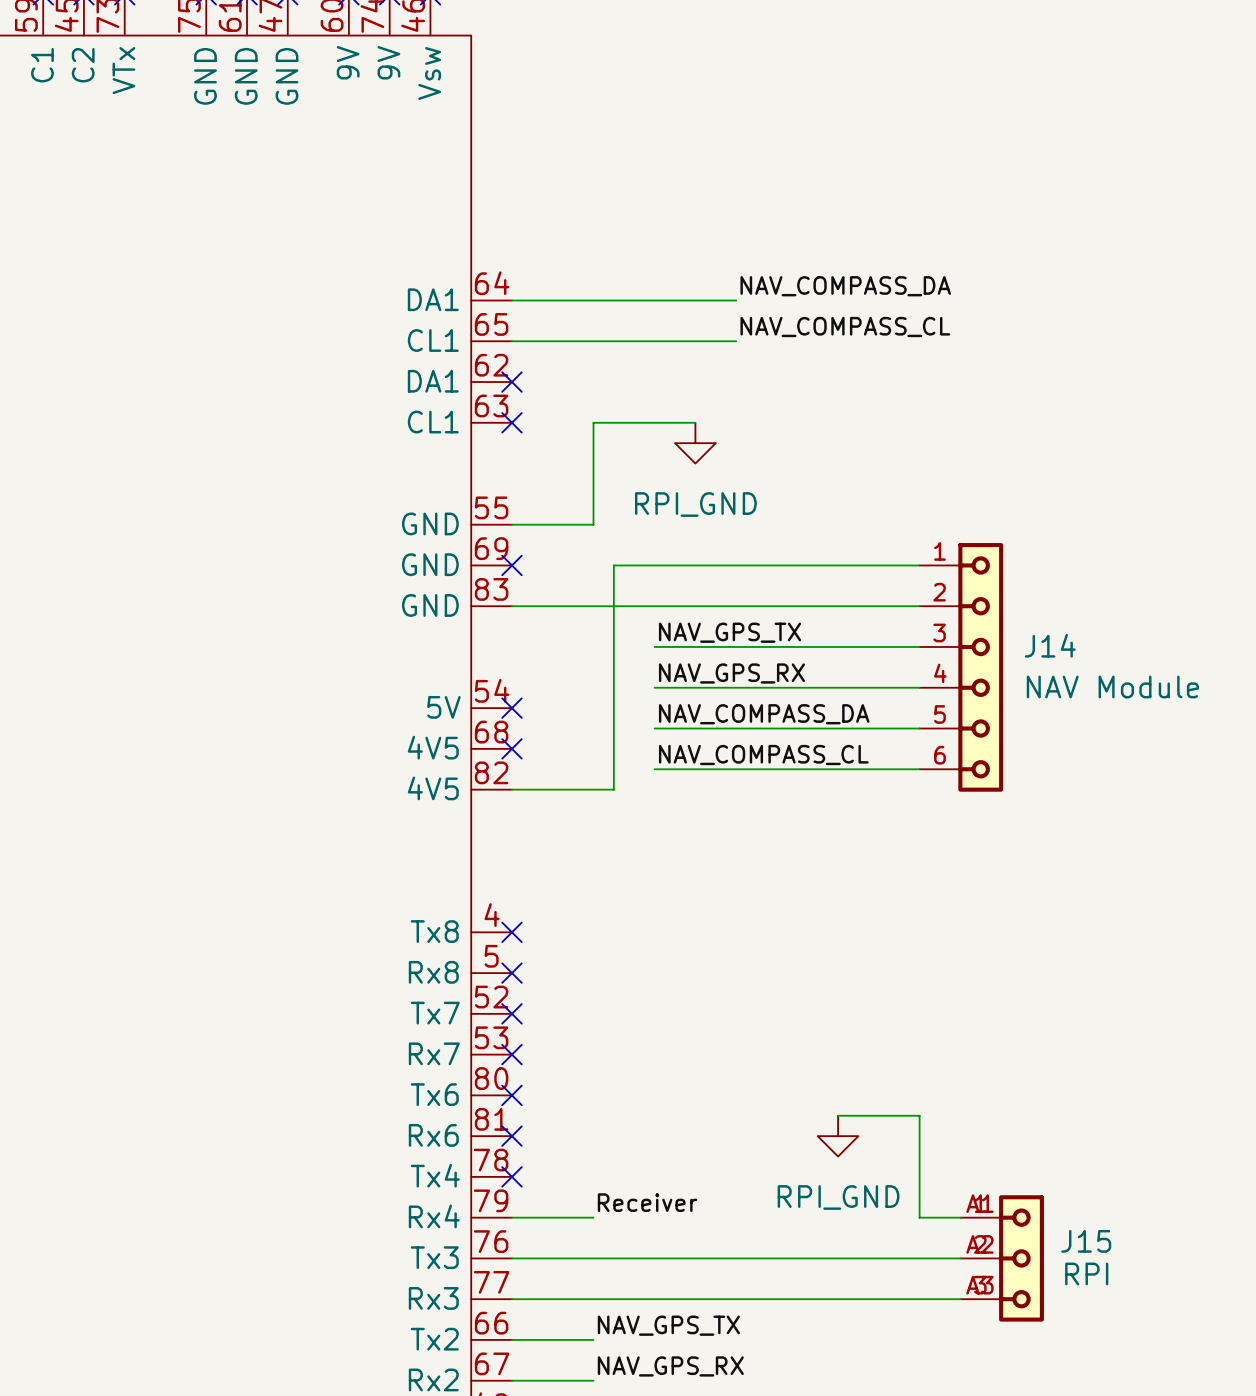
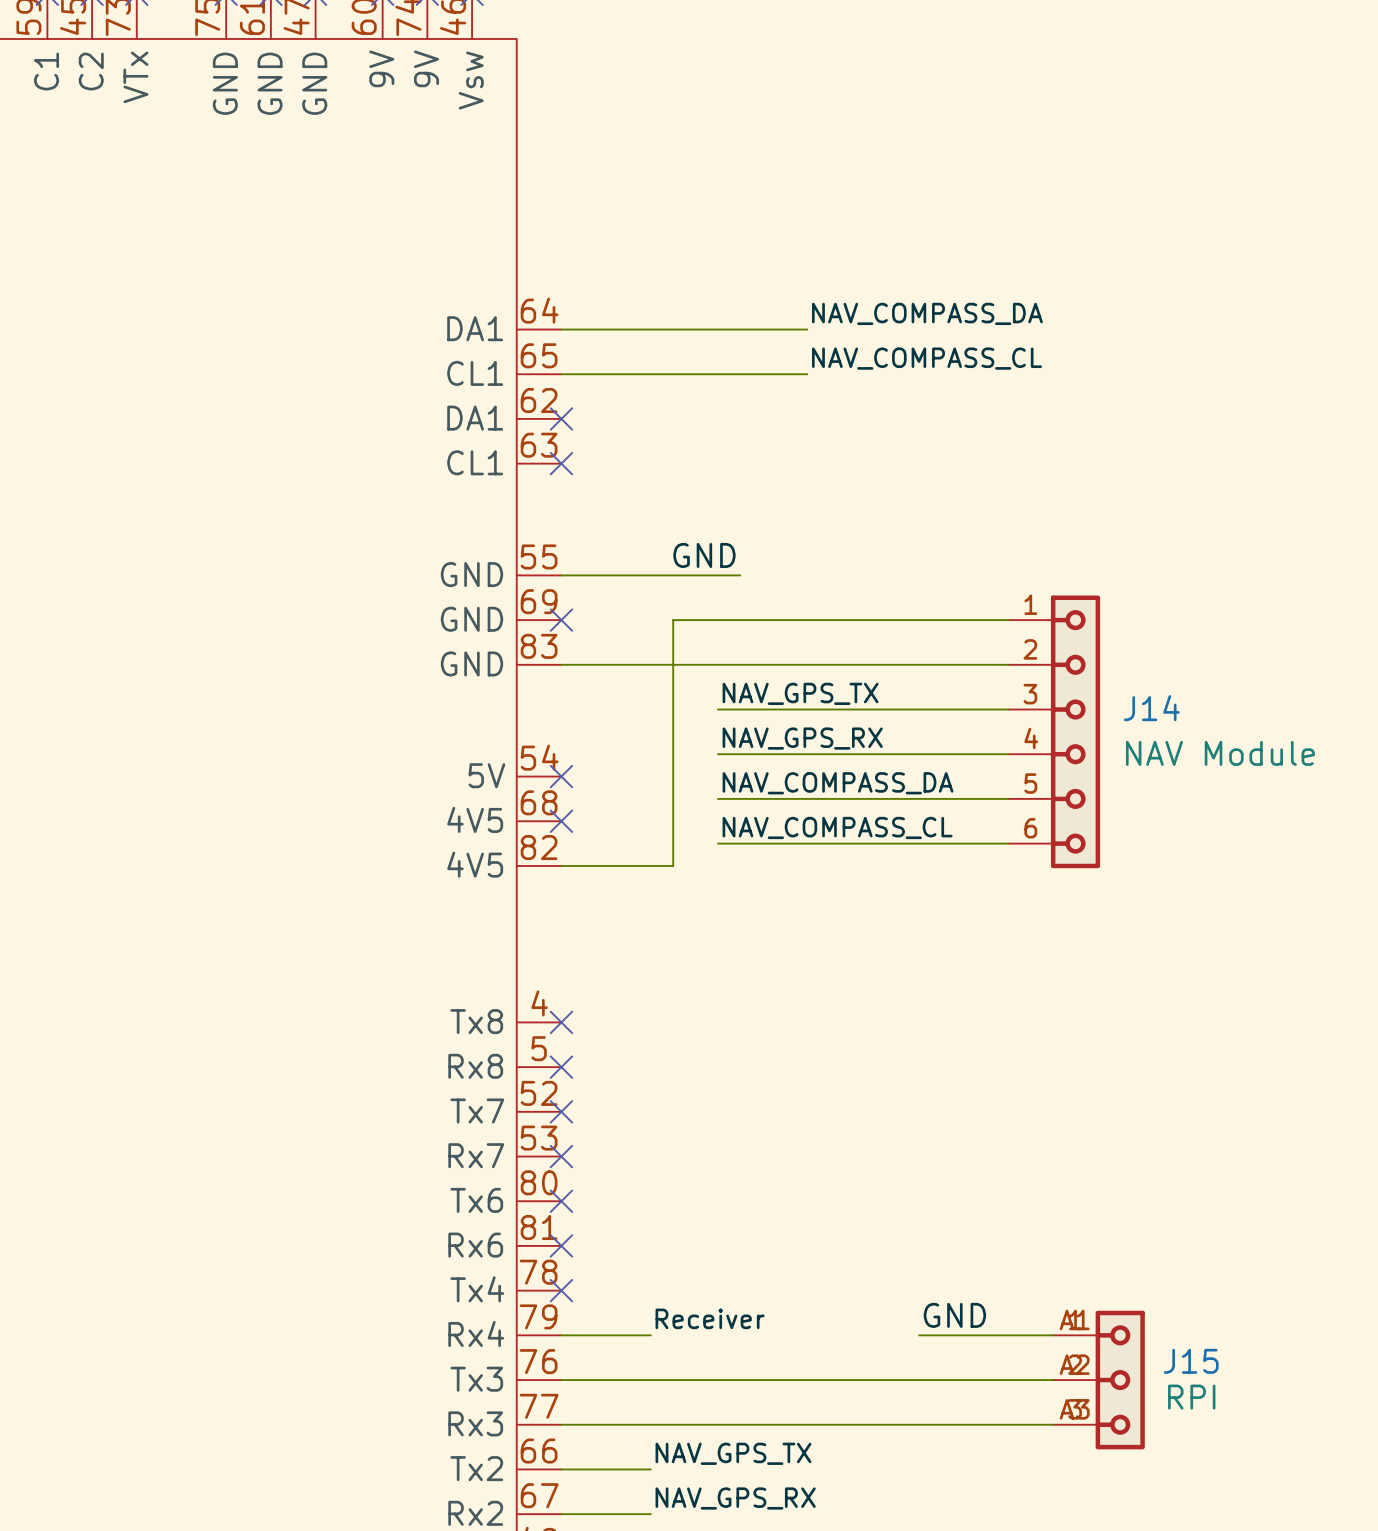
wire: (695, 422) (593, 422) (593, 524) -> (740, 575) (650, 575)
power symbol: RPI_GND (695, 443) -> none
label: none -> GND (704, 555)
wire: (838, 1115) (919, 1115) (919, 1217) -> (919, 1335) (1008, 1335)
power symbol: RPI_GND (838, 1136) -> none
label: none -> GND (954, 1315)

